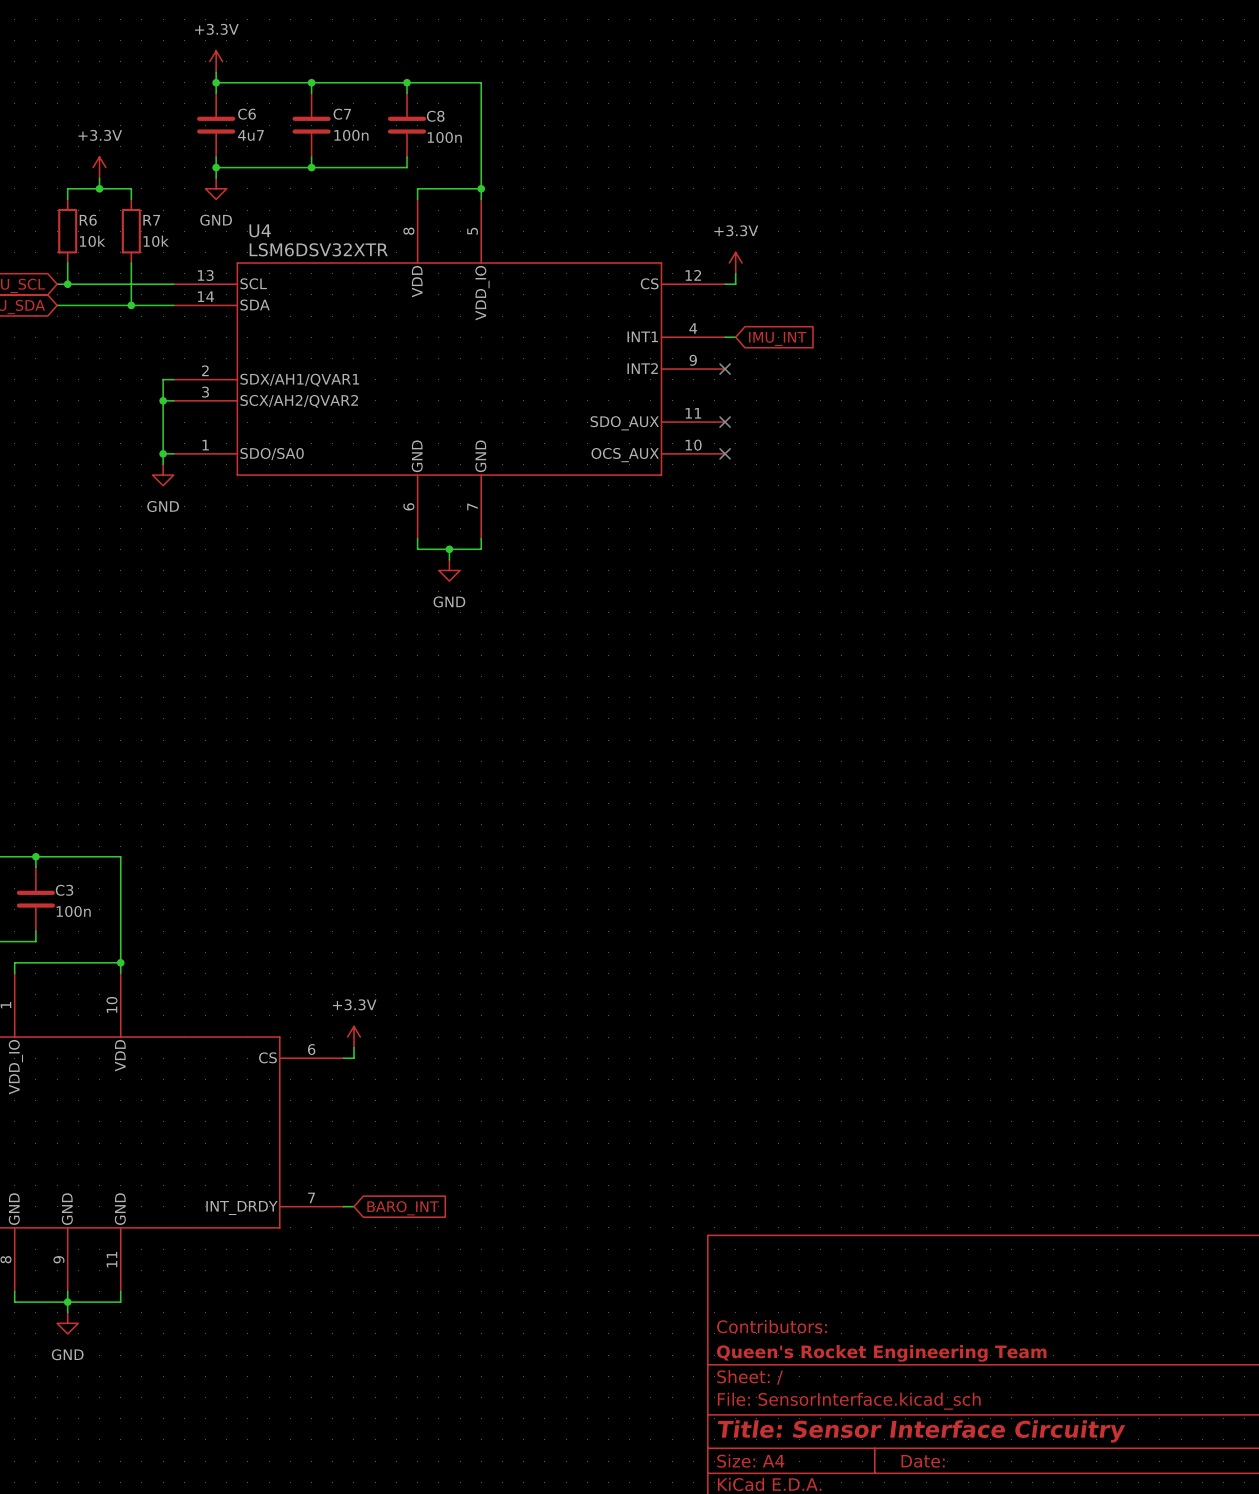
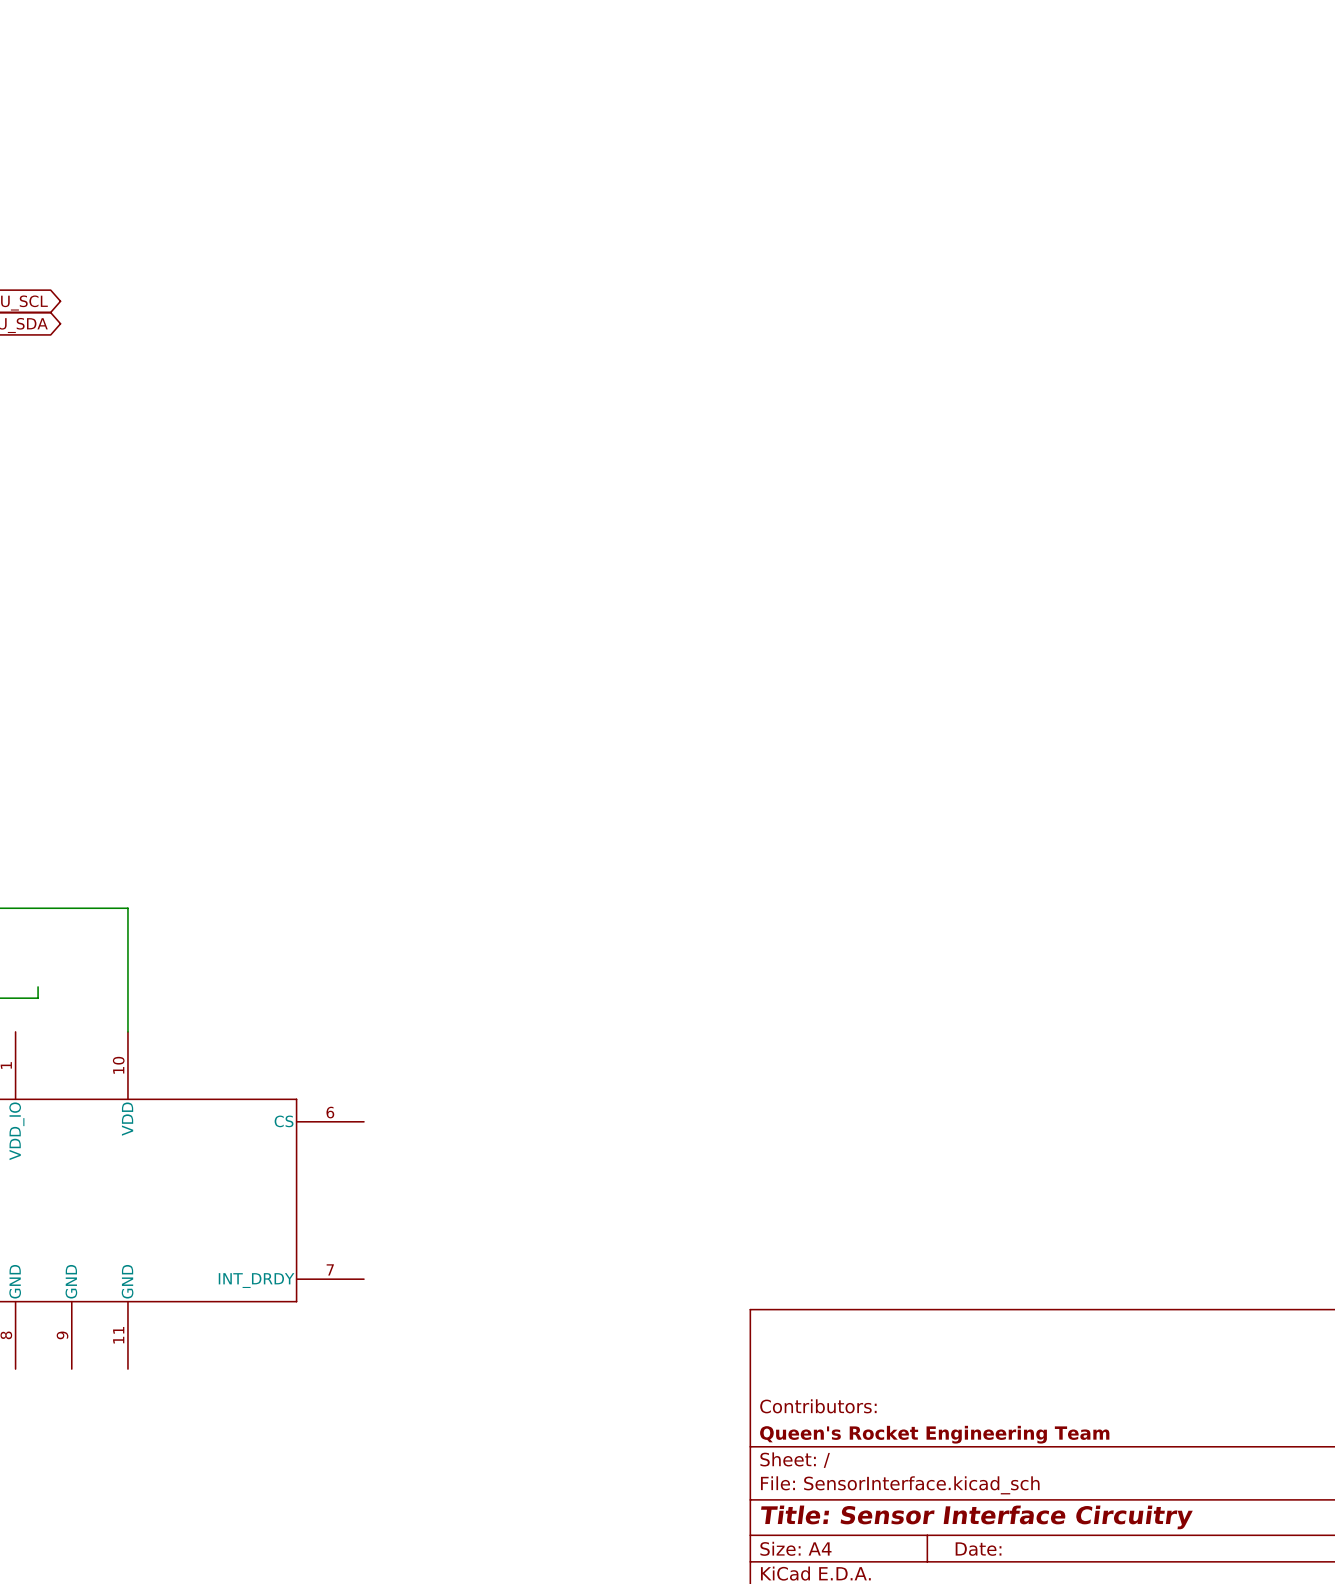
power symbol: +3.3V (216, 61) -> none
wire: (216, 72) (216, 93) -> none
wire: (216, 82) (481, 82) (481, 199) -> none
junction: (216, 82) -> none
wire: (311, 82) (311, 93) -> none
junction: (311, 82) -> none
wire: (407, 82) (407, 93) -> none
junction: (407, 82) -> none
C6: 4u7 (216, 125) -> none
C7: 100n (311, 125) -> none
C8: 100n (407, 125) -> none
wire: (216, 156) (216, 178) -> none
wire: (311, 156) (311, 167) -> none
wire: (407, 156) (407, 167) (216, 167) -> none
power symbol: +3.3V (99, 167) -> none
junction: (216, 167) -> none
junction: (311, 167) -> none
wire: (99, 178) (99, 188) -> none
junction: (99, 188) -> none
power symbol: GND (216, 188) -> none
wire: (481, 188) (417, 188) (417, 199) -> none
junction: (481, 188) -> none
wire: (67, 199) (67, 188) (131, 188) (131, 199) -> none
R6: 10k (67, 231) -> none
R7: 10k (131, 231) -> none
wire: (67, 263) (67, 284) -> none
wire: (131, 263) (131, 305) -> none
power symbol: +3.3V (735, 263) -> none
wire: (735, 273) (735, 284) (725, 284) -> none
wire: (57, 284) (173, 284) -> none
junction: (67, 284) -> none
wire: (57, 305) (173, 305) -> none
junction: (131, 305) -> none
wire: (725, 337) (735, 337) -> none
global label: IMU_INT (777, 338) -> none
U4: LSM6DSV32XTR (449, 369) -> none
no-connect mark: (725, 369) -> none
wire: (173, 379) (163, 379) (163, 464) -> none
wire: (163, 400) (173, 400) -> none
junction: (163, 400) -> none
no-connect mark: (725, 422) -> none
wire: (163, 453) (173, 453) -> none
junction: (163, 453) -> none
no-connect mark: (725, 453) -> none
power symbol: GND (163, 475) -> none
wire: (417, 538) (417, 549) (481, 549) (481, 538) -> none
wire: (449, 549) (449, 559) -> none
junction: (449, 549) -> none
power symbol: GND (449, 570) -> none
wire: (35, 856) (35, 867) -> none
junction: (35, 856) -> none
C3: 100n (35, 899) -> none
wire: (120, 962) (14, 962) (14, 973) -> none
junction: (120, 962) -> none
power symbol: +3.3V (353, 1037) -> none
wire: (353, 1047) (353, 1058) (343, 1058) -> none
wire: (343, 1206) (353, 1206) -> none
global label: BARO_INT (403, 1208) -> none
wire: (14, 1291) (14, 1302) (120, 1302) (120, 1291) -> none
wire: (67, 1291) (67, 1312) -> none
junction: (67, 1302) -> none
power symbol: GND (67, 1323) -> none

